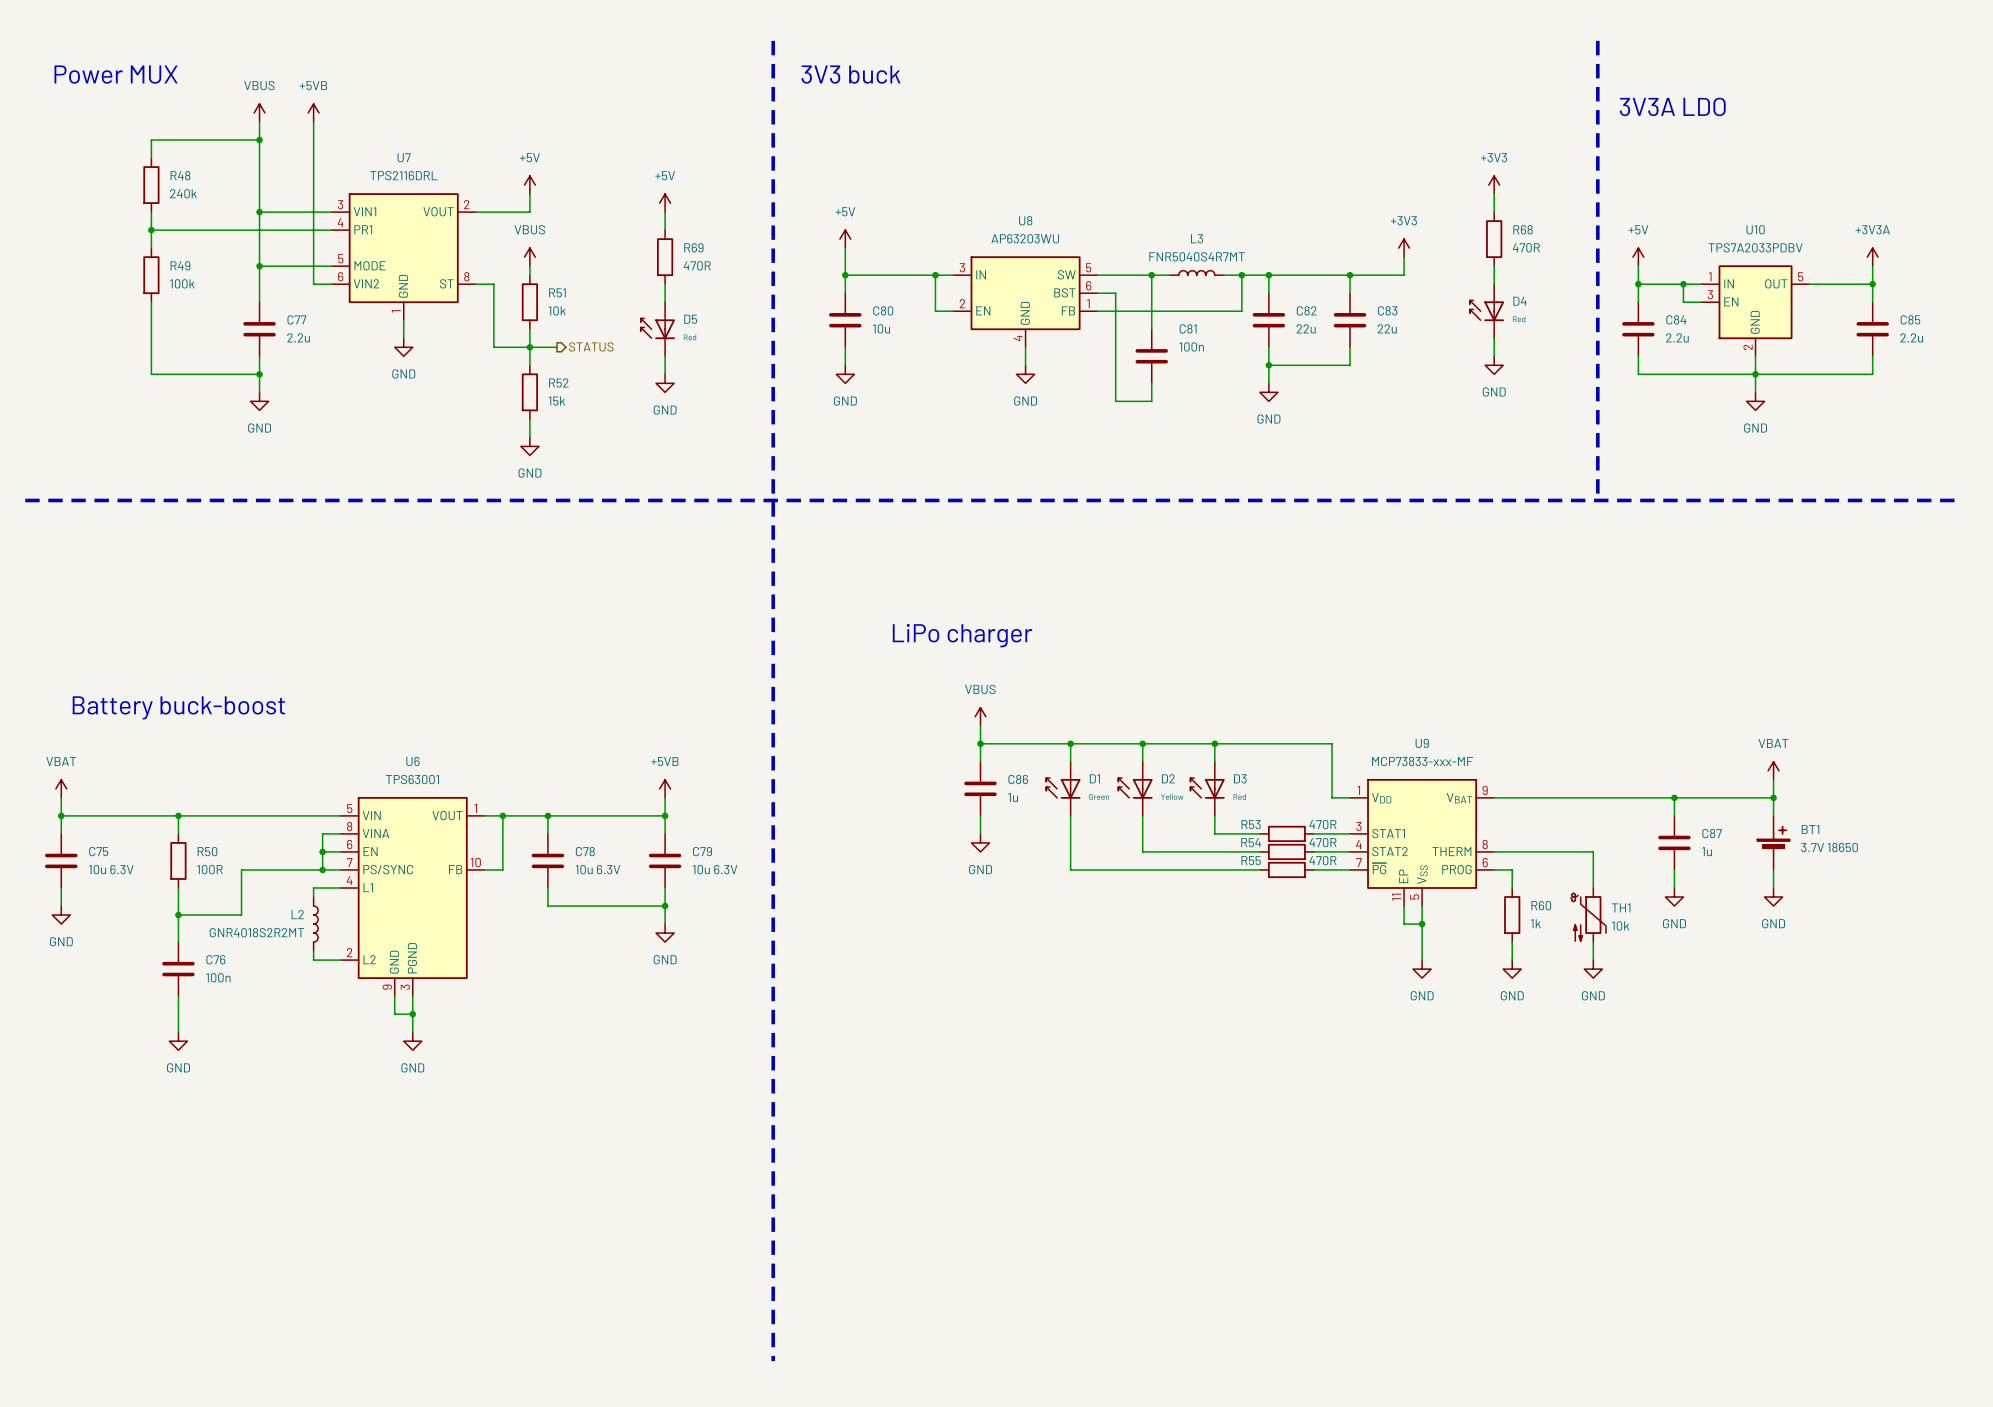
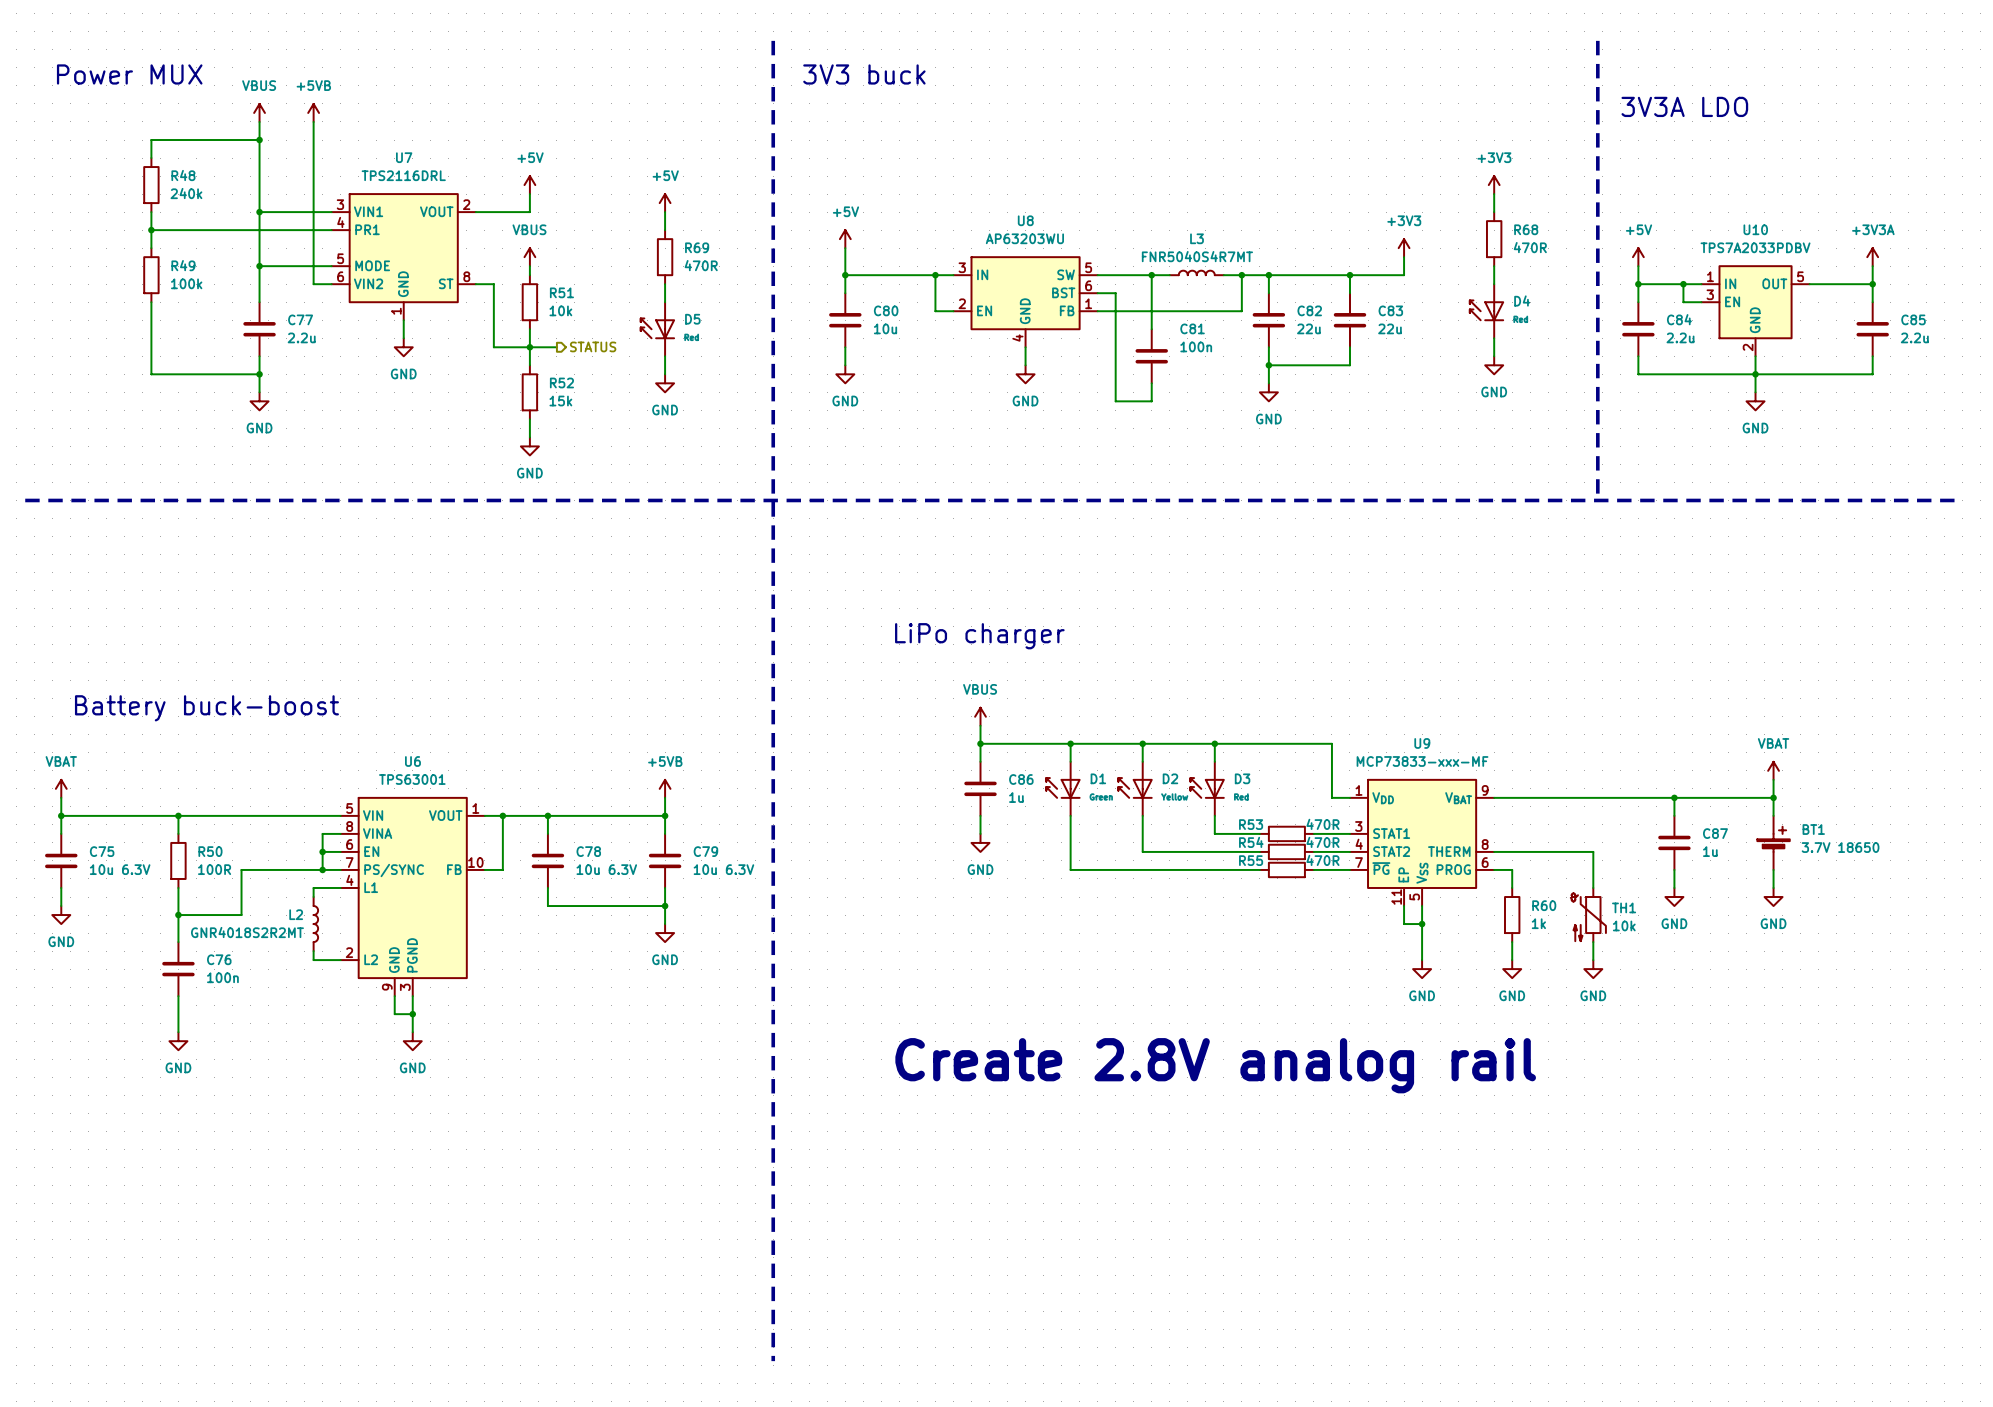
text: none -> Create 2.8V analog rail (1215, 1065)

